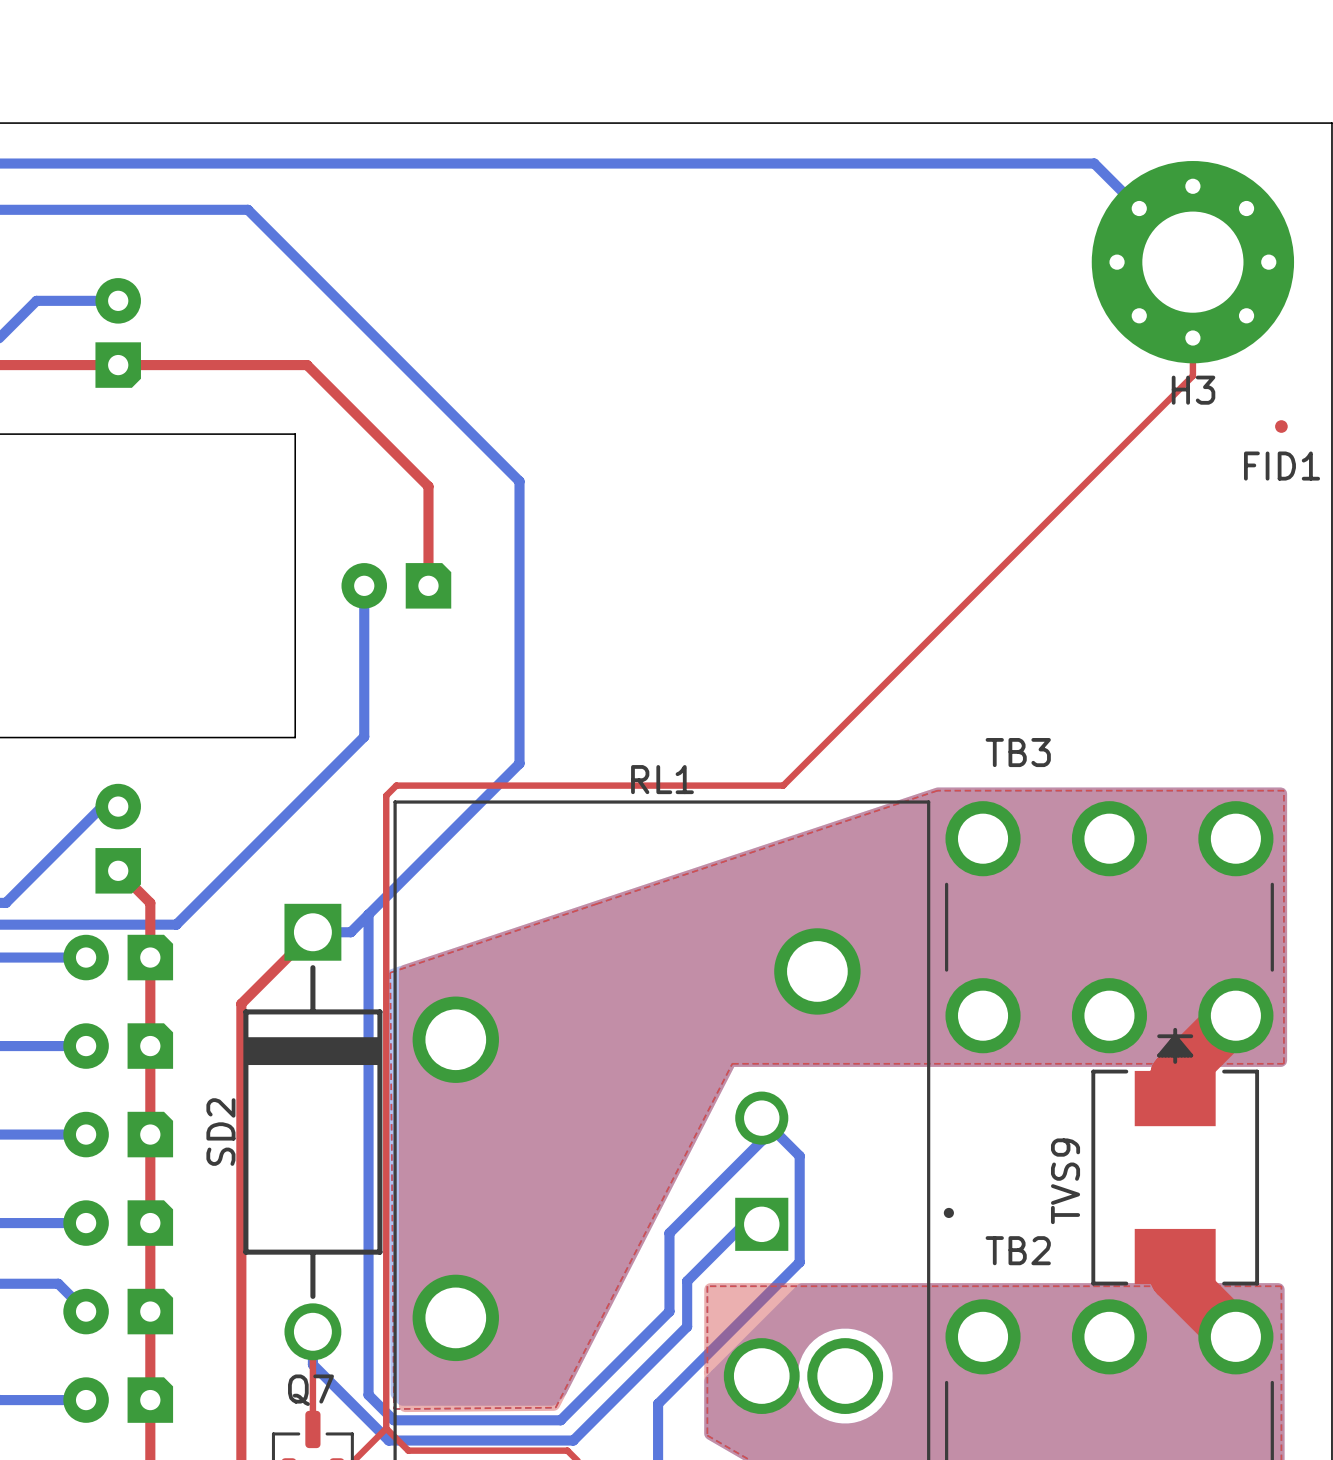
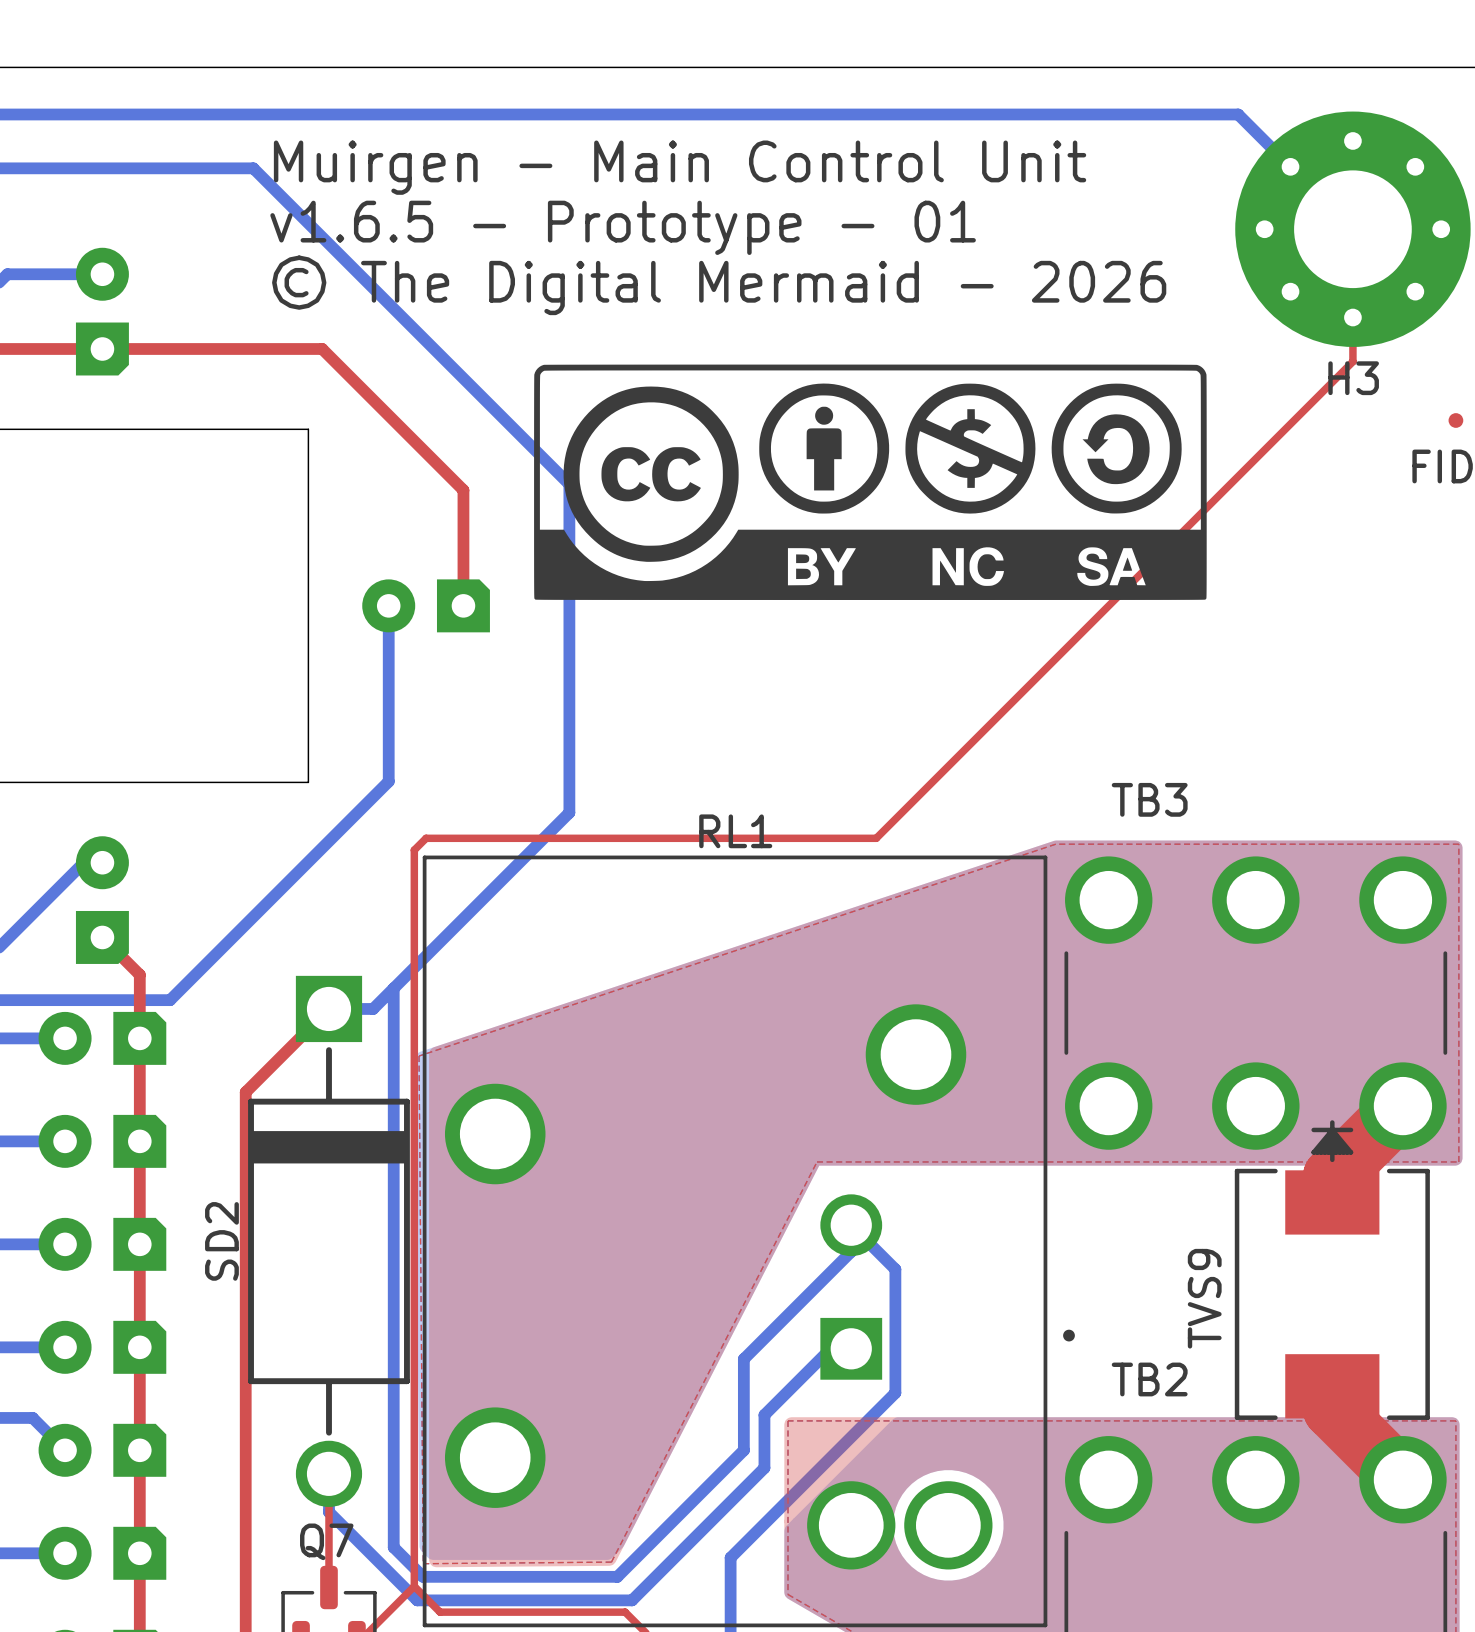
text: none -> Muirgen - Main Control Unit (680, 167)
text: none -> v1.6.5 - Prototype - 01 (623, 227)
text: none -> © The Digital Mermaid - 2026 (719, 285)
drawing: none -> [534, 364, 1207, 600]

